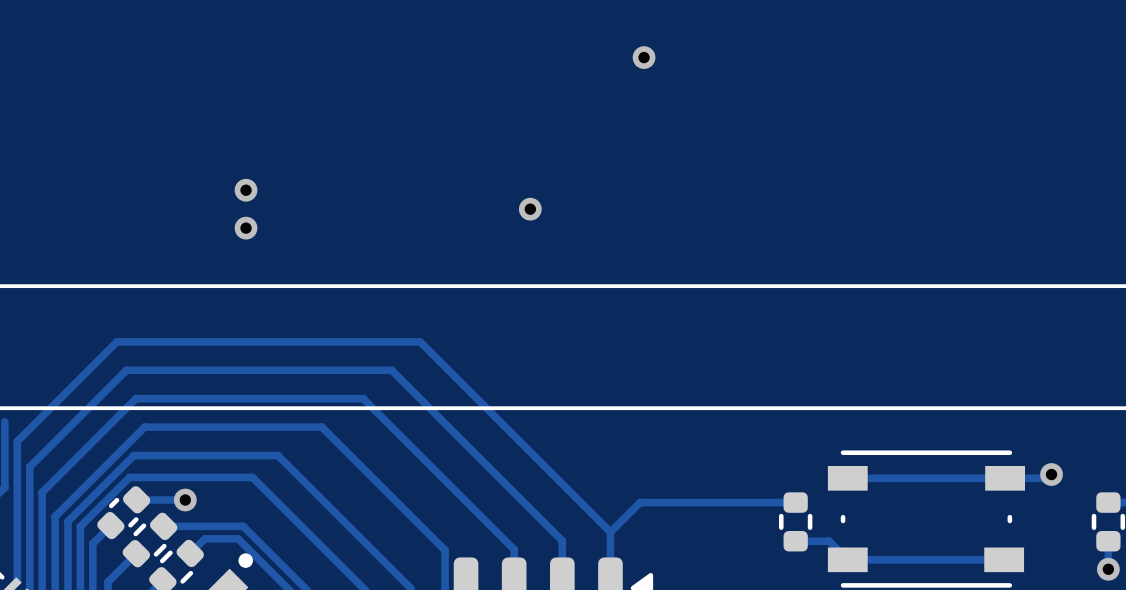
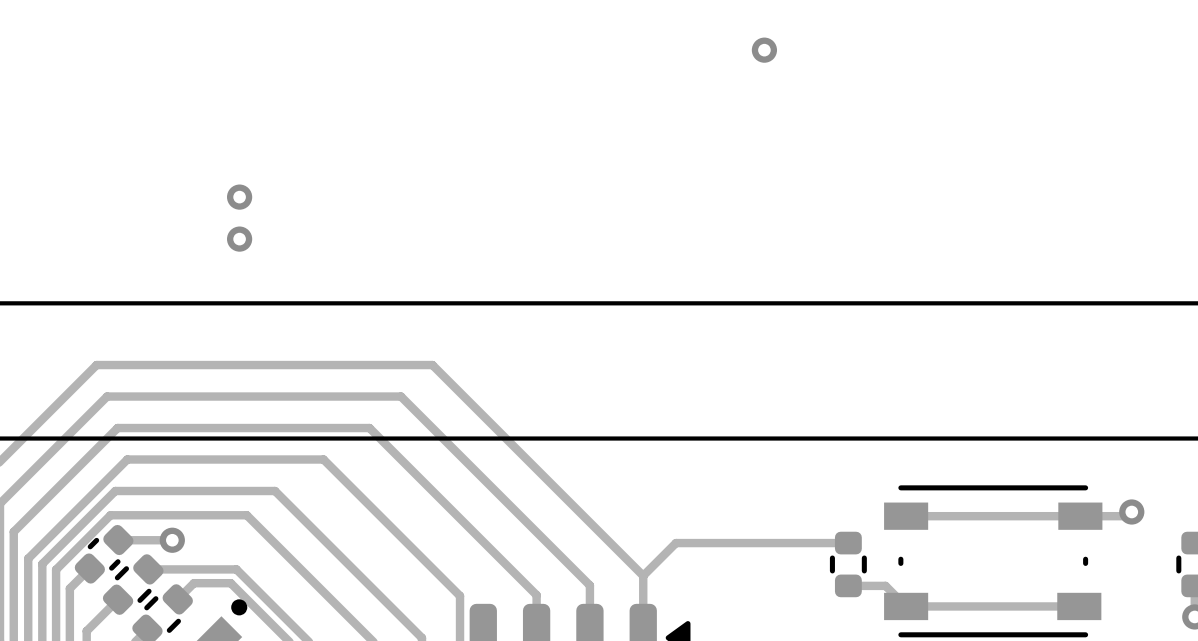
via position: (644, 57) -> (764, 50)
via: (530, 209) -> none

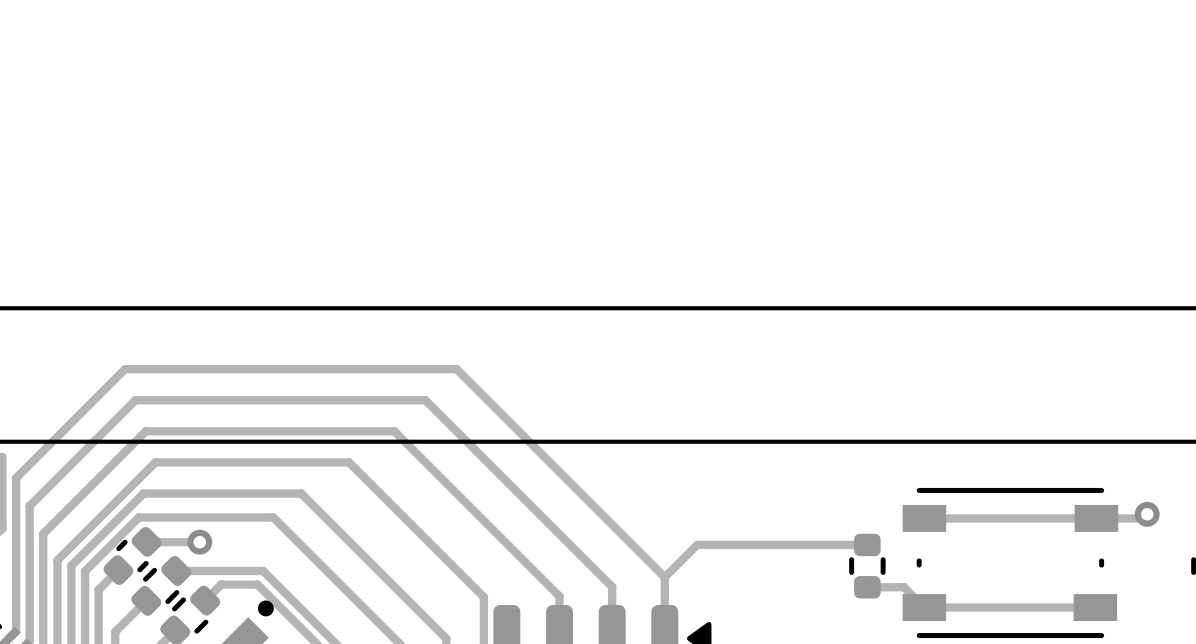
via: (764, 50) -> none
via: (239, 197) -> none
via: (239, 239) -> none

